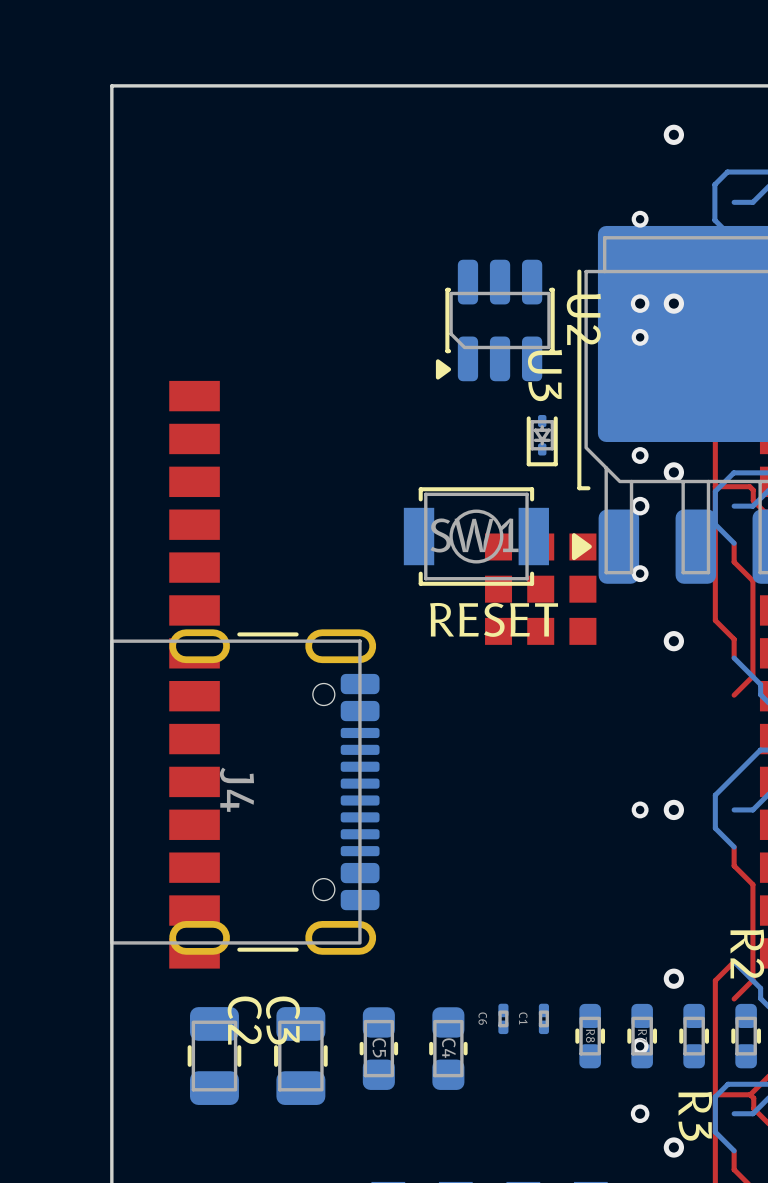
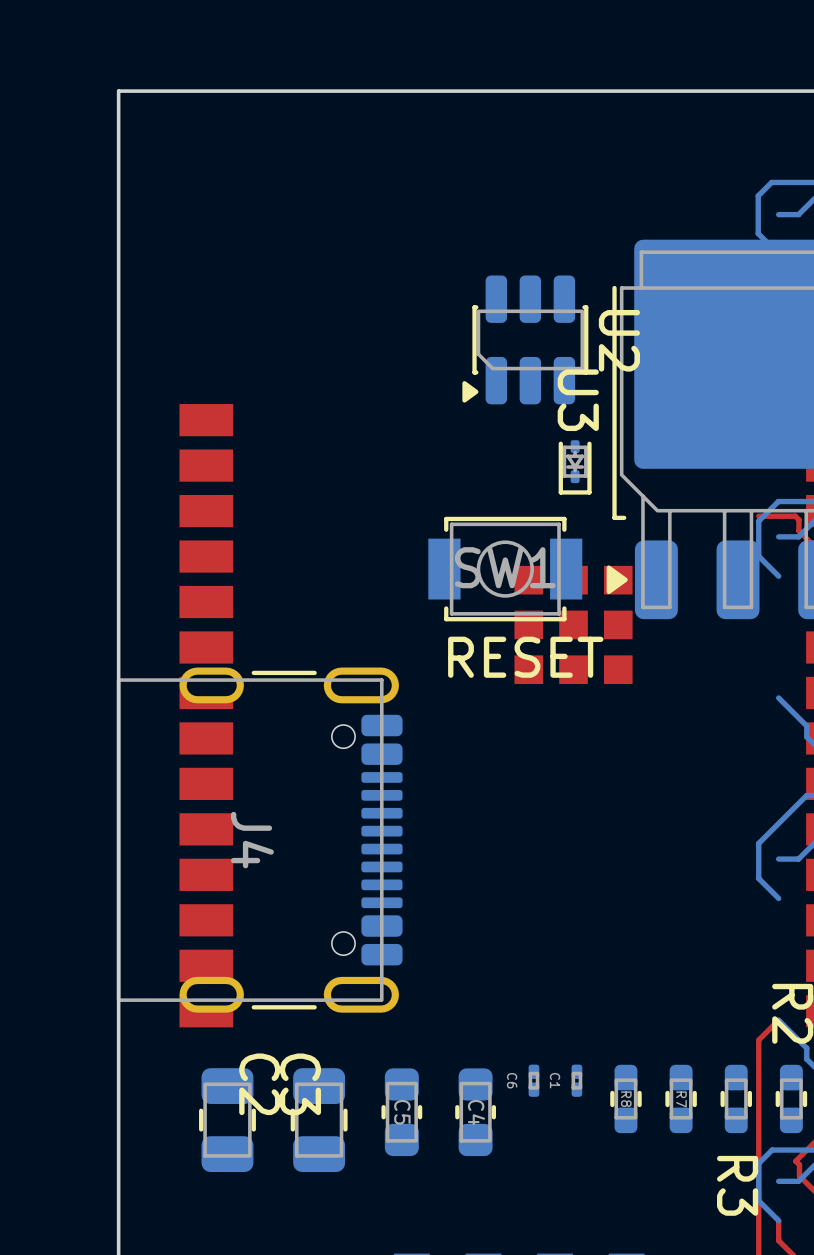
via: (673, 134) -> none
via: (640, 219) -> none
via: (640, 303) -> none
via: (673, 303) -> none
via: (640, 337) -> none
top track: (734, 354) (715, 373) (715, 620) (734, 639) (734, 658) -> none
via: (640, 455) -> none
via: (673, 472) -> none
via: (640, 506) -> none
top track: (734, 543) (734, 562) (752, 580) (752, 676) (734, 695) -> none
via: (640, 573) -> none
via: (673, 641) -> none
via: (640, 809) -> none
via: (673, 809) -> none
top track: (734, 847) (734, 865) (752, 884) (752, 980) (734, 998) -> none
via: (673, 978) -> none
via: (640, 1046) -> none
top track: (750, 1094) (715, 1094) -> none
via: (640, 1113) -> none
via: (673, 1147) -> none

